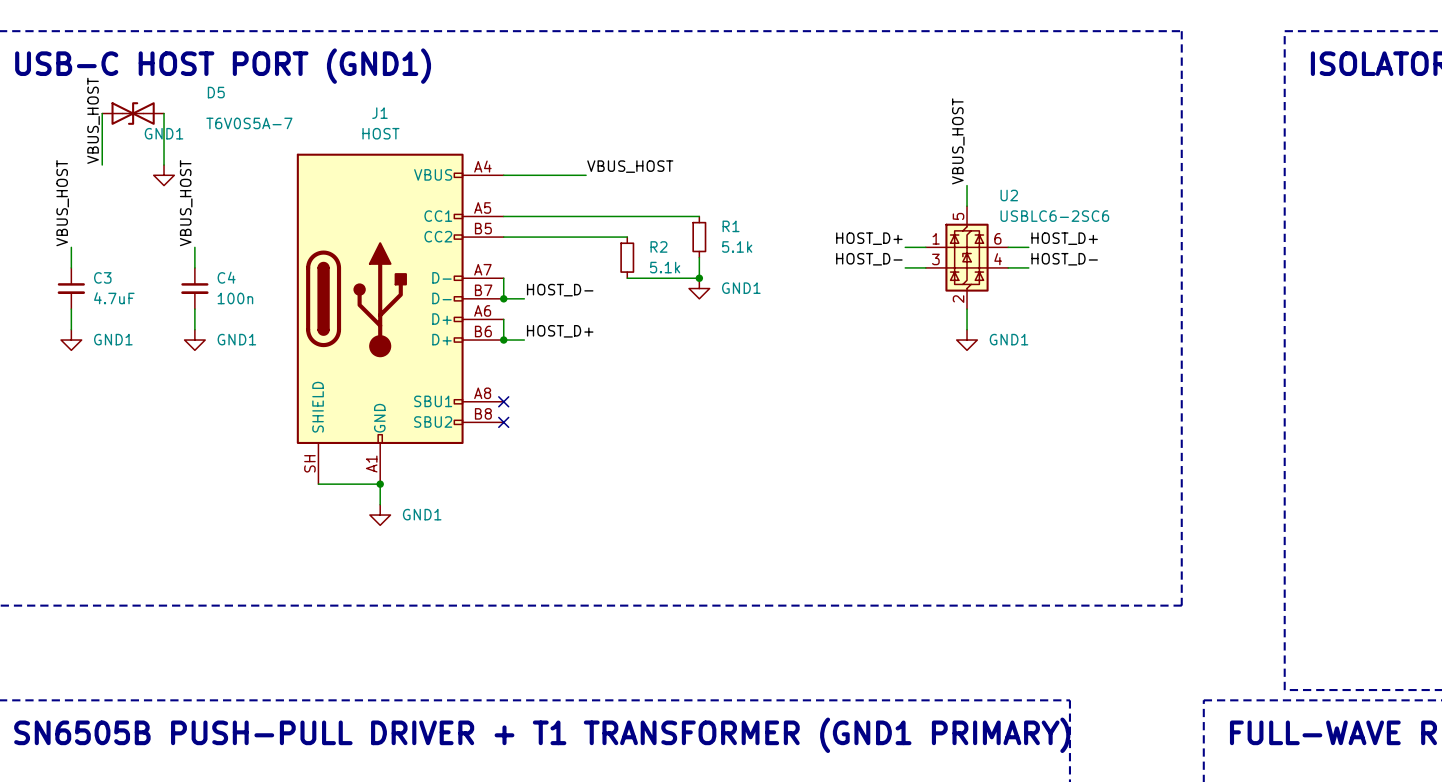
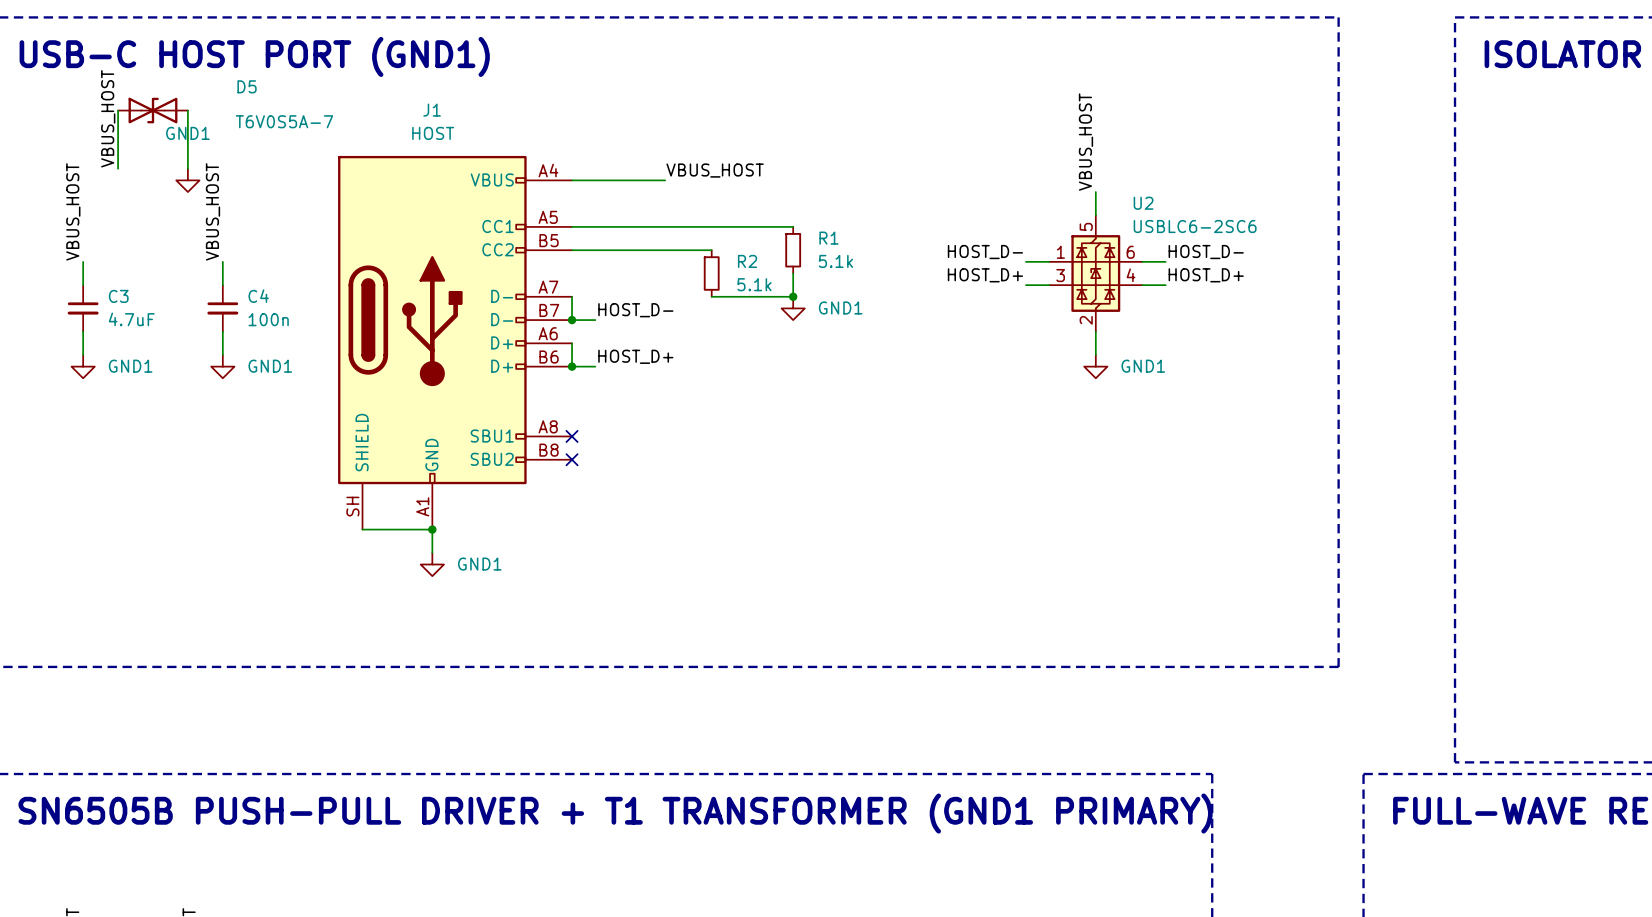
label: HOST_D+ (869, 238) -> HOST_D- (985, 252)
label: HOST_D+ (1064, 238) -> HOST_D- (1206, 252)
label: HOST_D- (869, 259) -> HOST_D+ (985, 275)
label: HOST_D- (1064, 259) -> HOST_D+ (1206, 275)

